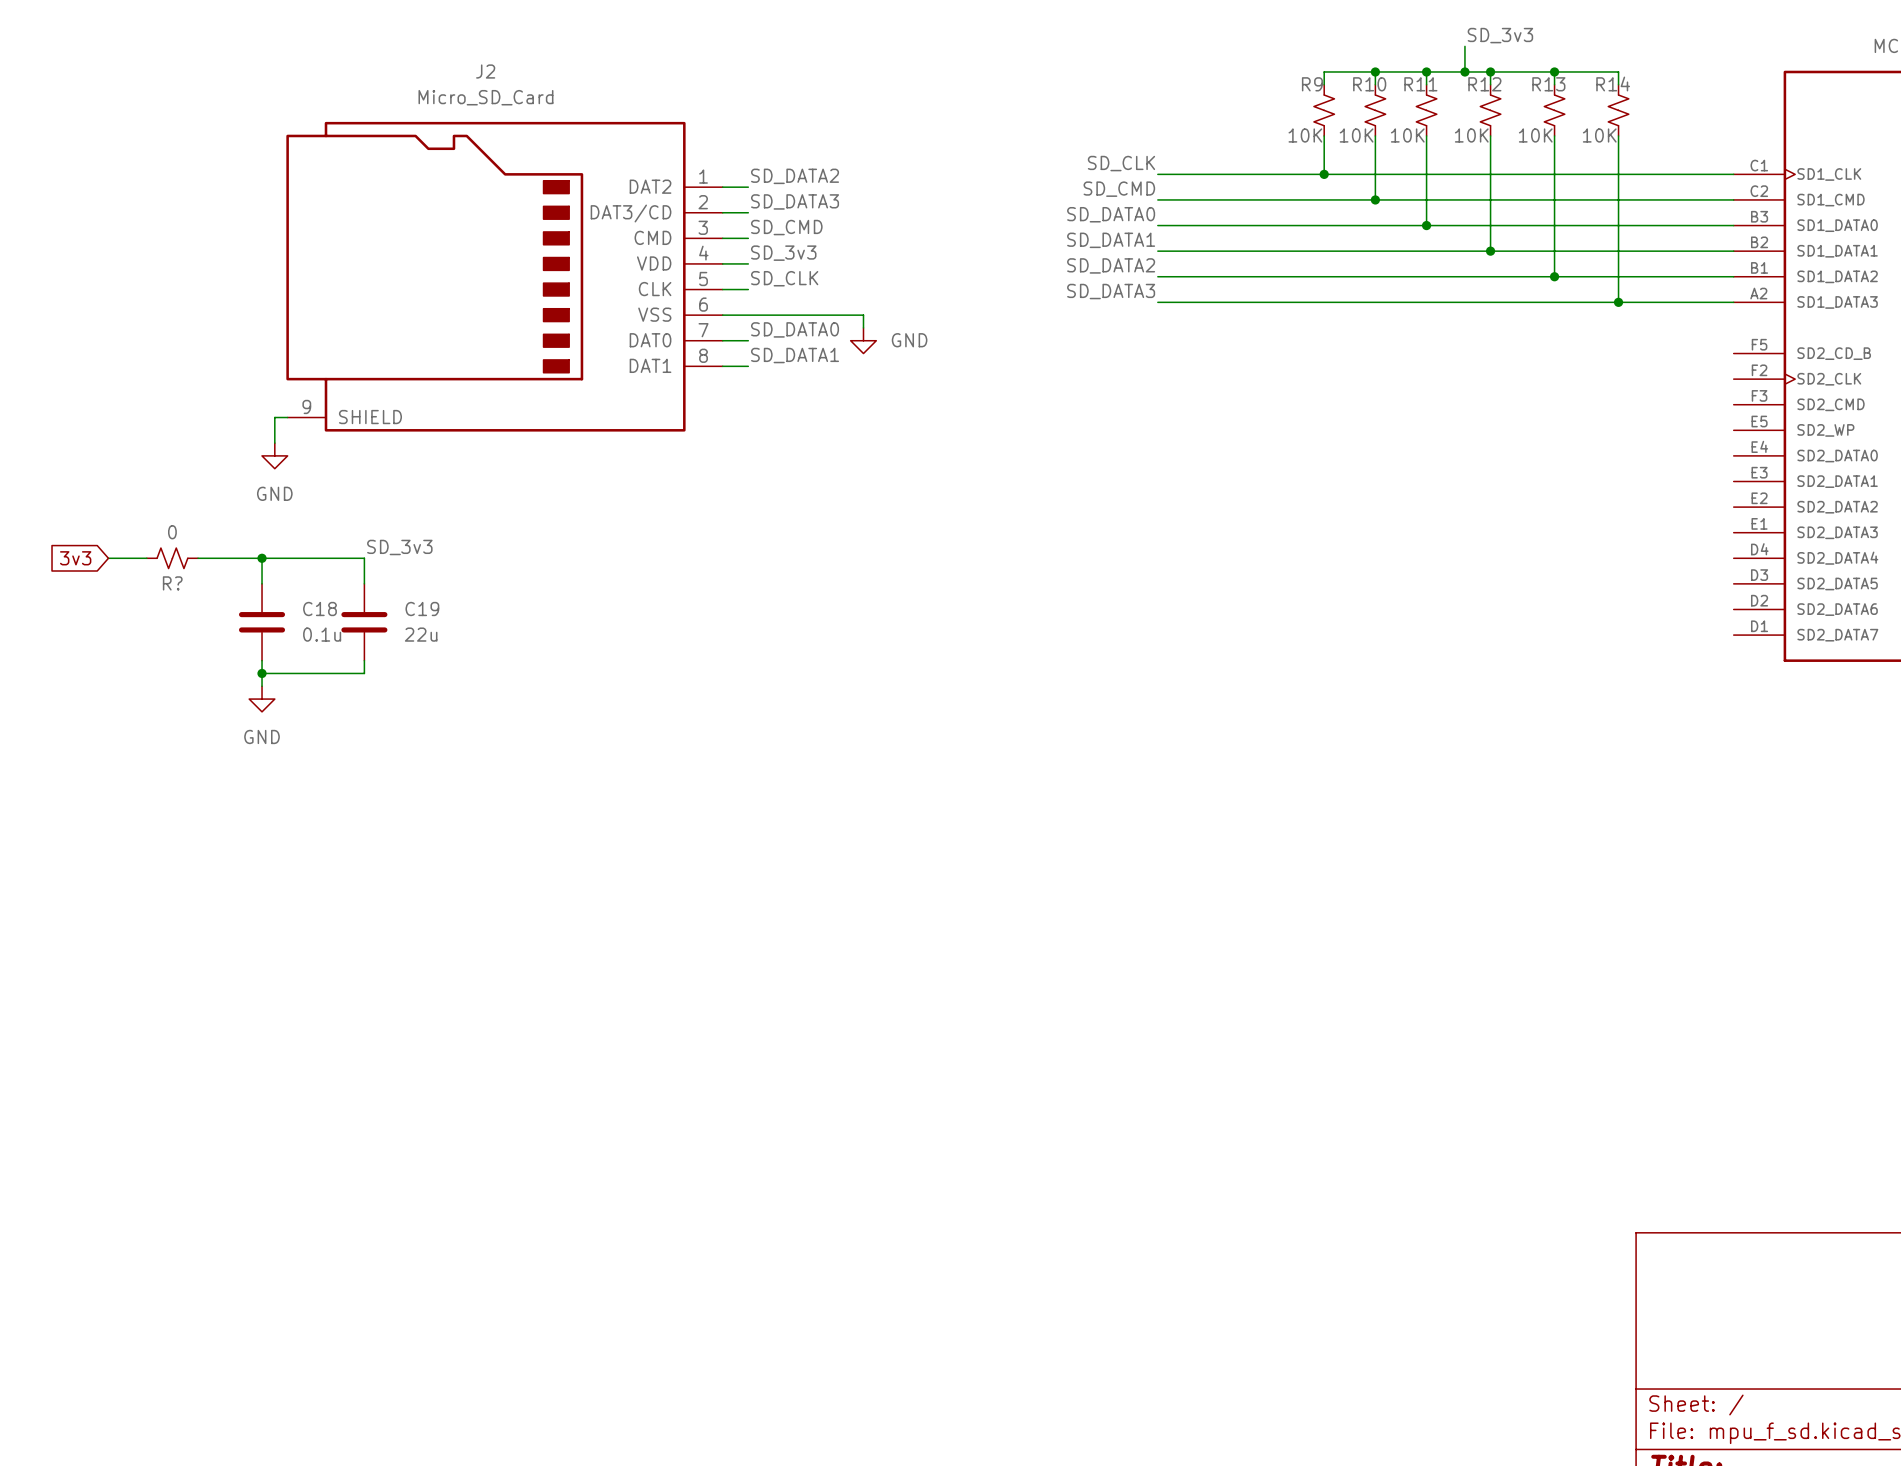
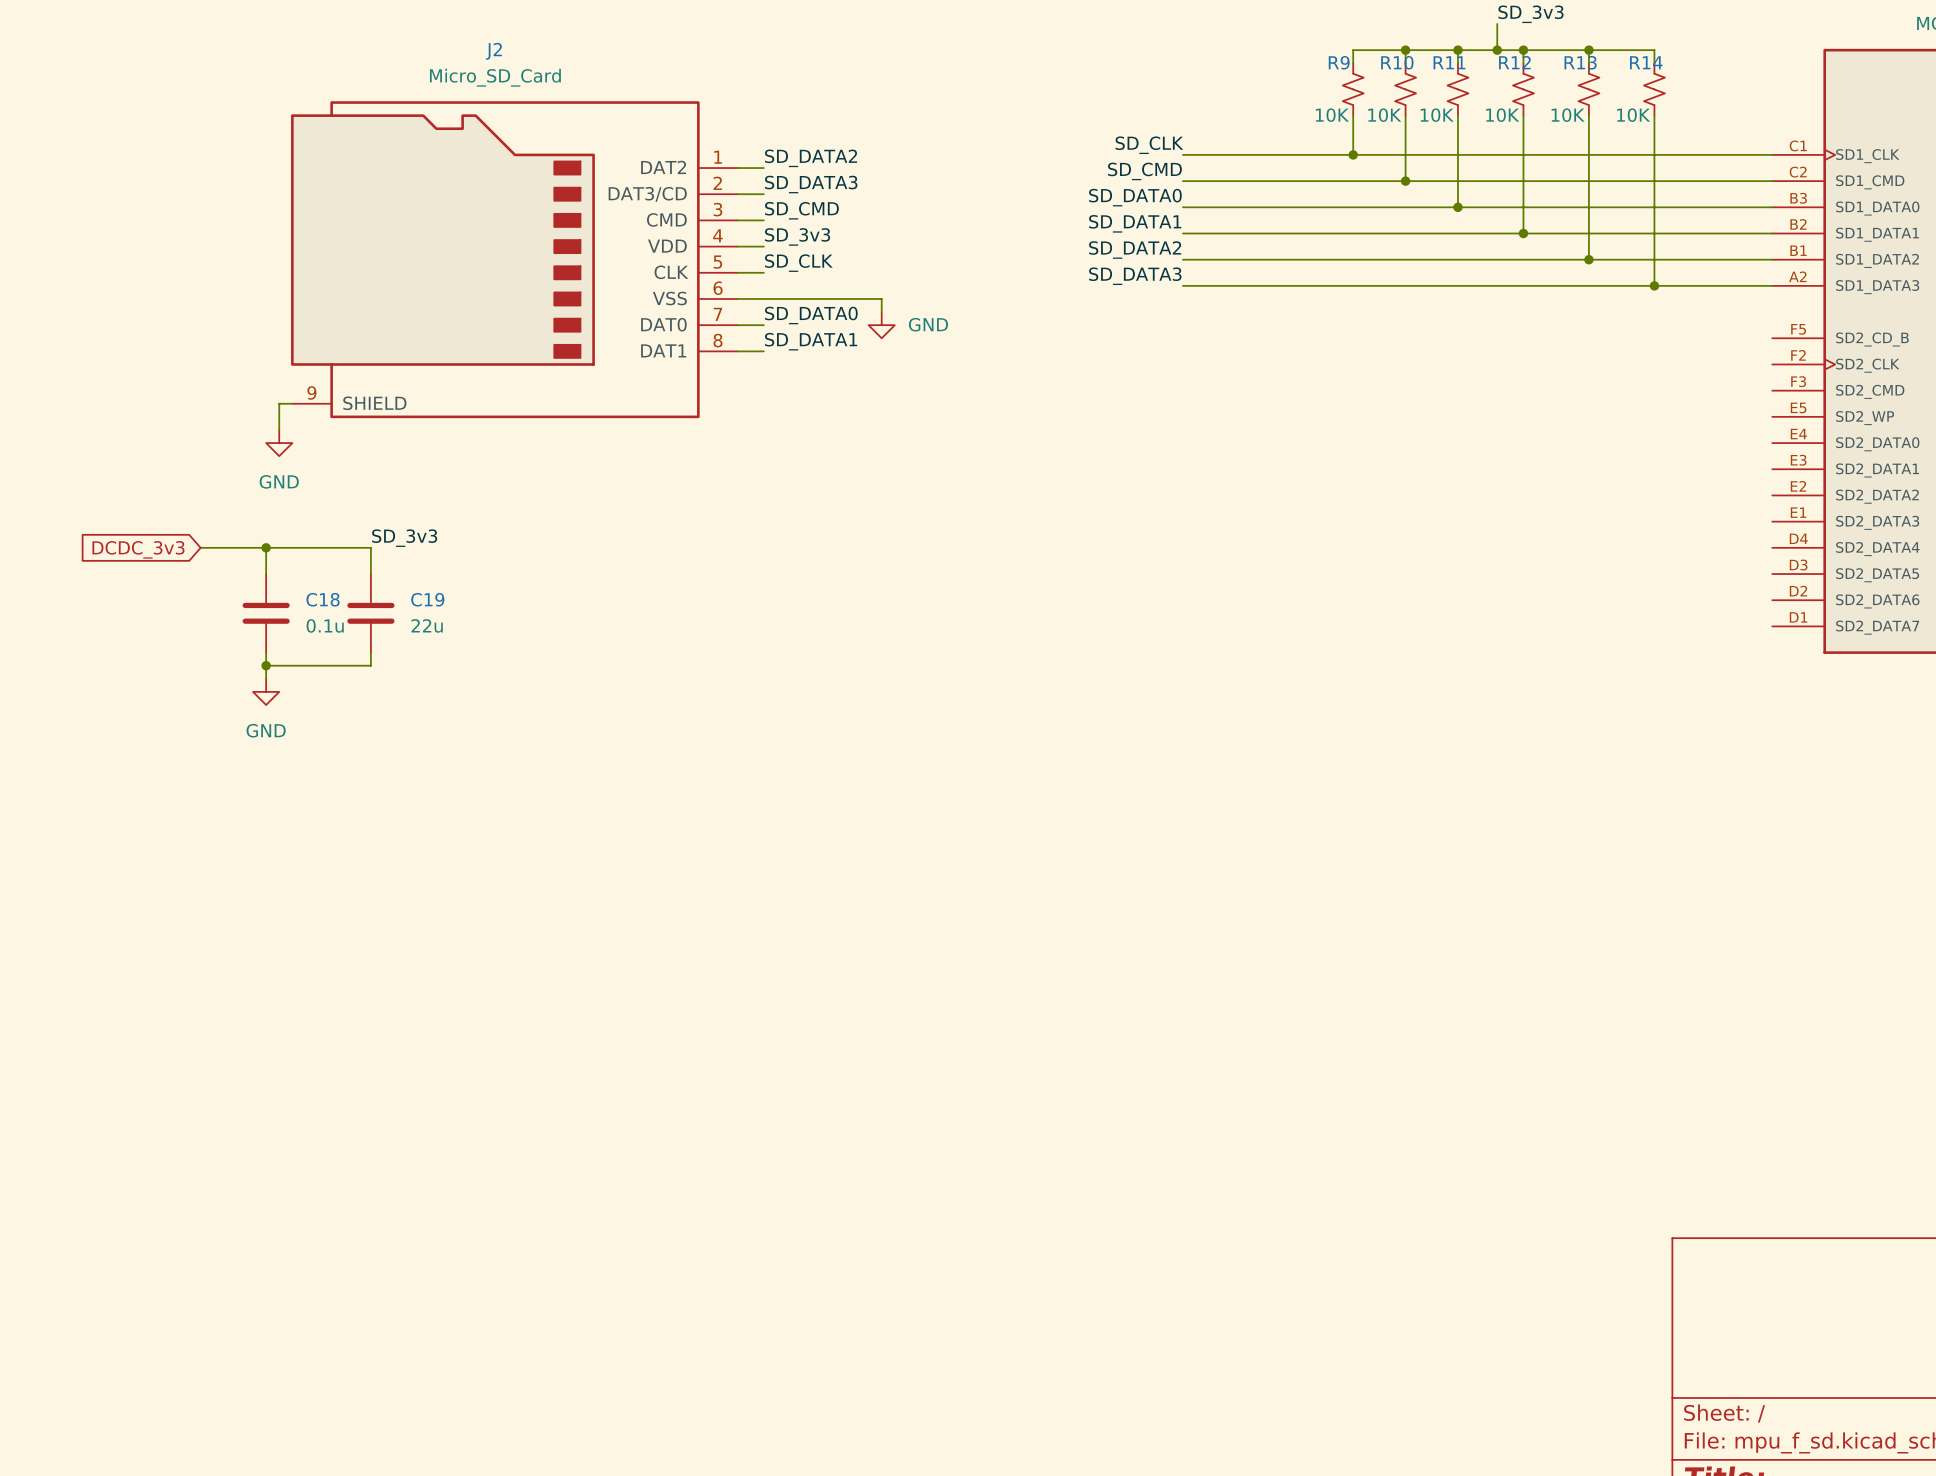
global label: 3v3 (75, 558) -> none
wire: (108, 558) (146, 558) -> none
global label: none -> DCDC_3v3 (138, 549)
R?: 0 (172, 558) -> none

